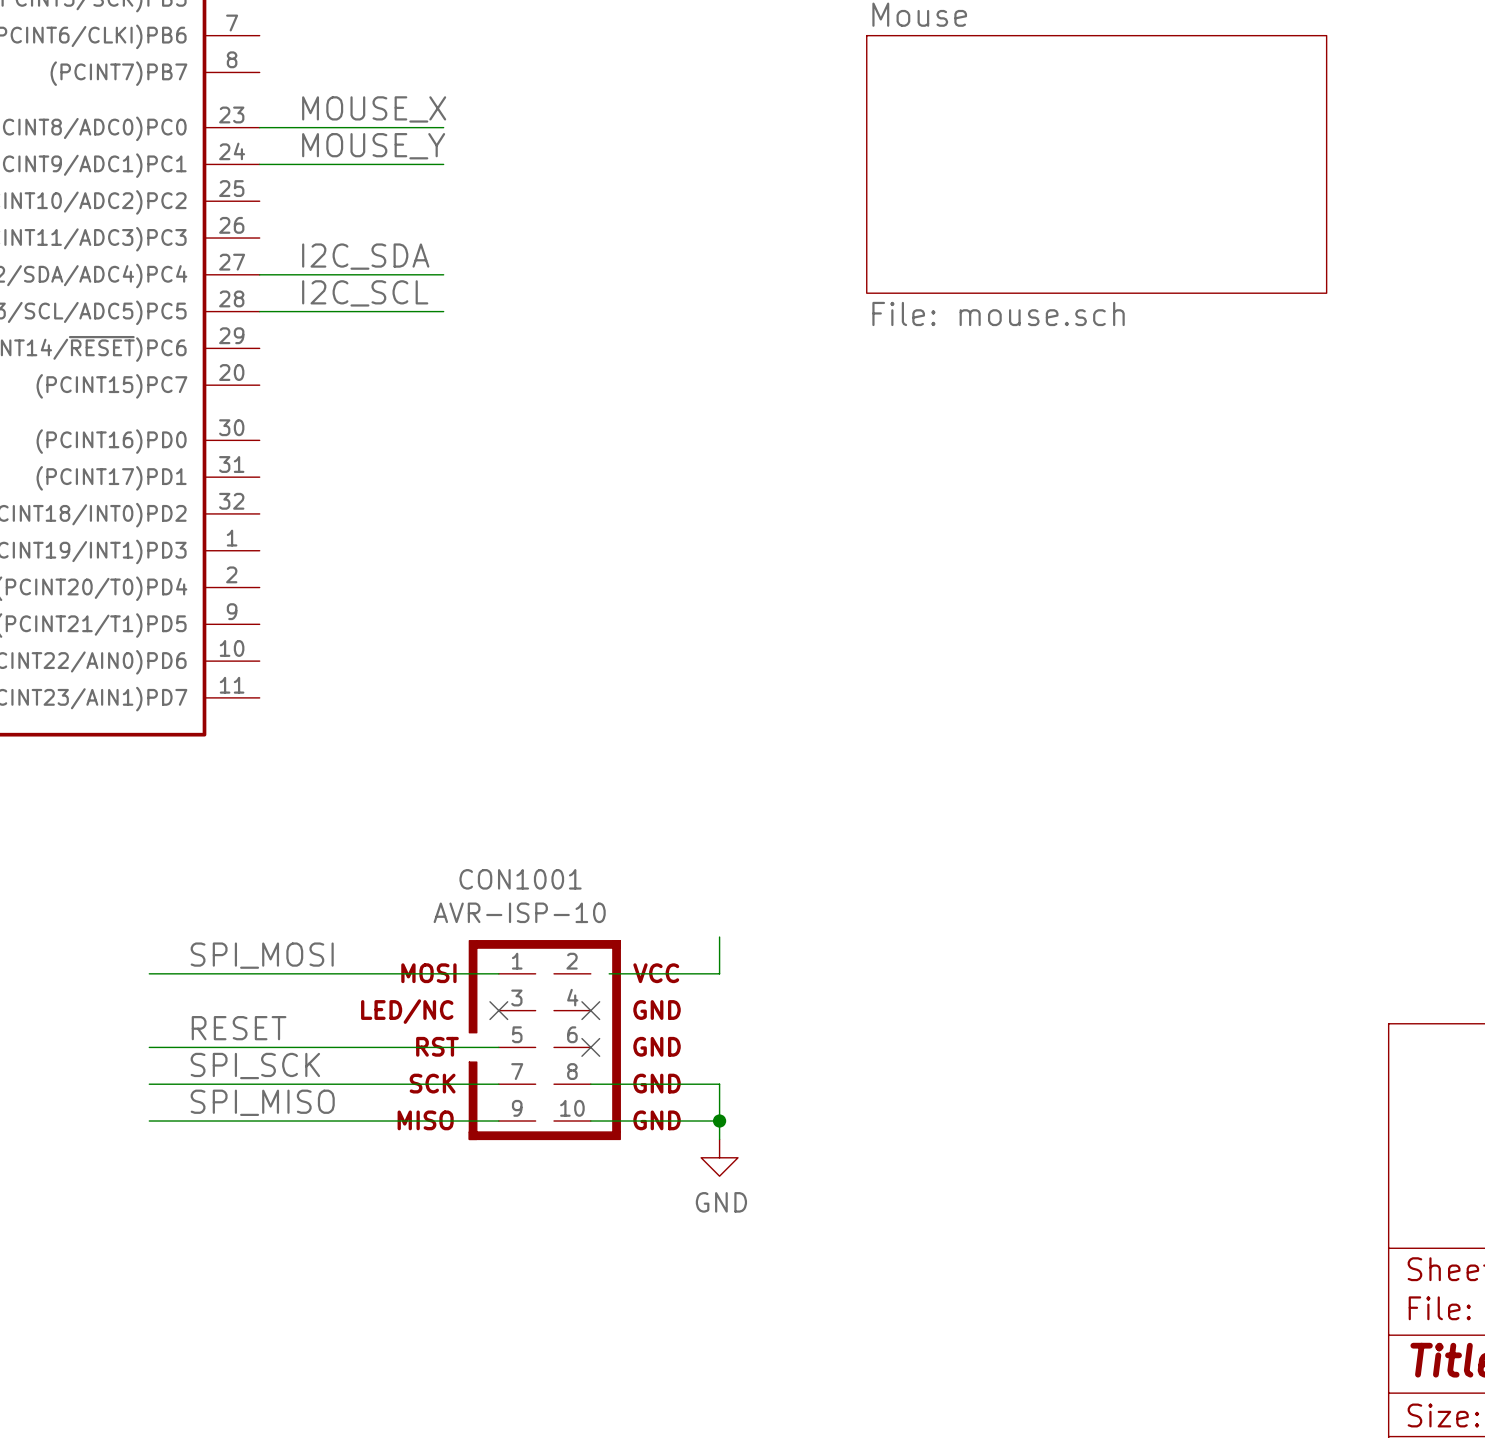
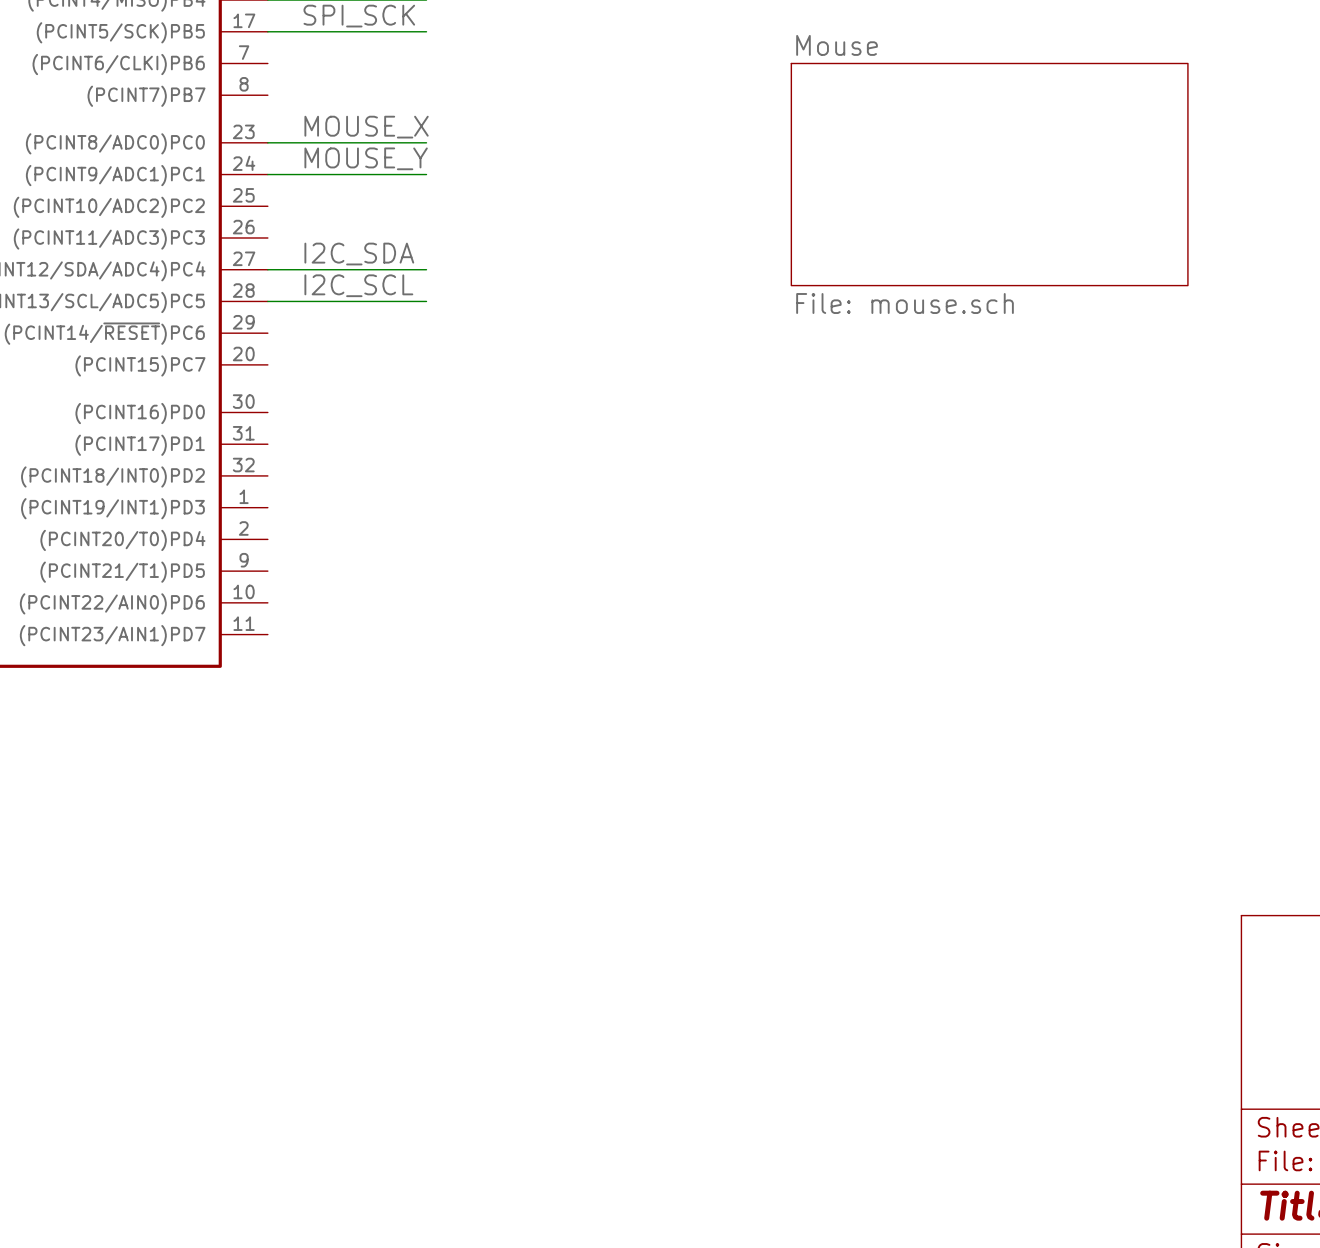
wire: (719, 937) (719, 973) (609, 973) -> none
label: SPI_MOSI (262, 955) -> none
wire: (149, 973) (498, 973) -> none
no-connect mark: (498, 1010) -> none
no-connect mark: (590, 1010) -> none
label: RESET (239, 1028) -> none
CON1001: AVR-ISP-10 (544, 1040) -> none
wire: (149, 1047) (498, 1047) -> none
no-connect mark: (590, 1047) -> none
label: SPI_SCK (255, 1066) -> none
wire: (149, 1084) (498, 1084) -> none
wire: (590, 1084) (719, 1084) (719, 1139) -> none
label: SPI_MISO (262, 1102) -> none
wire: (149, 1121) (498, 1121) -> none
wire: (590, 1121) (719, 1121) -> none
junction: (719, 1121) -> none
power symbol: GND (719, 1157) -> none

